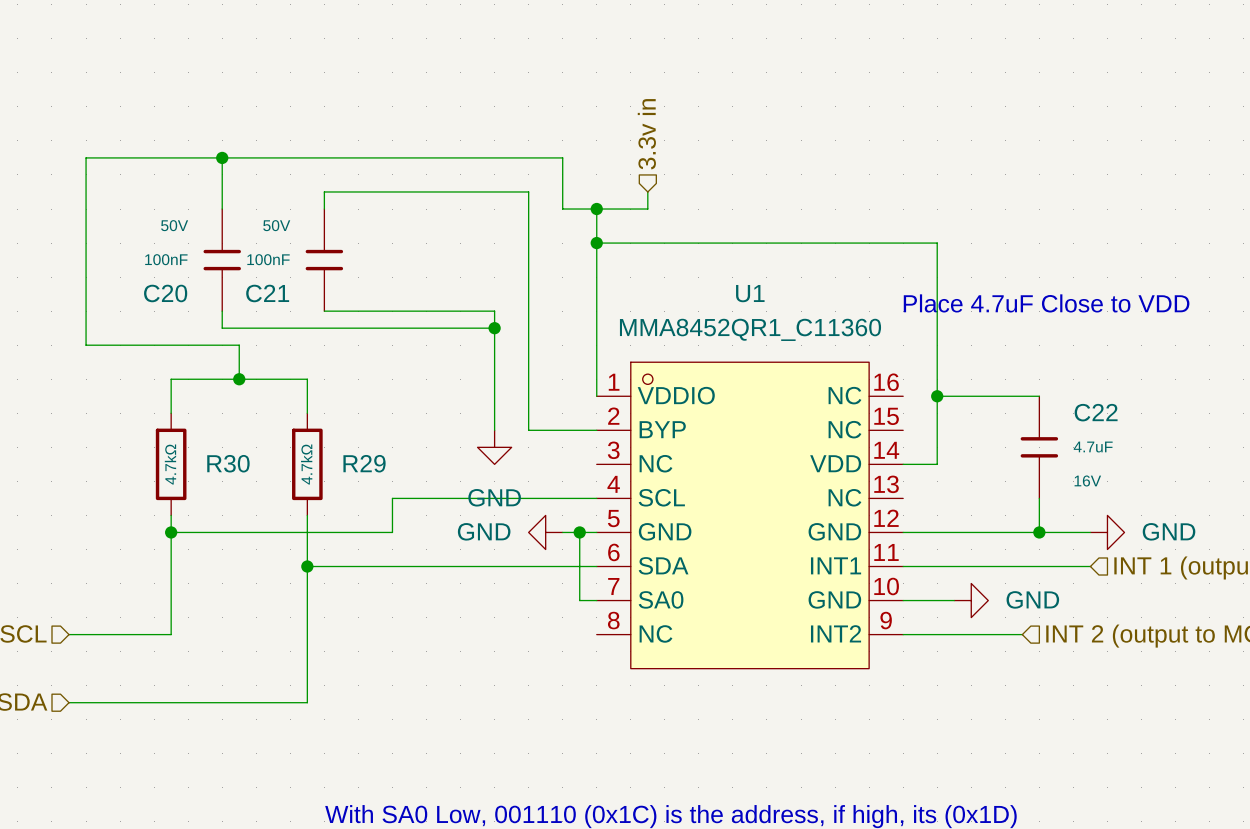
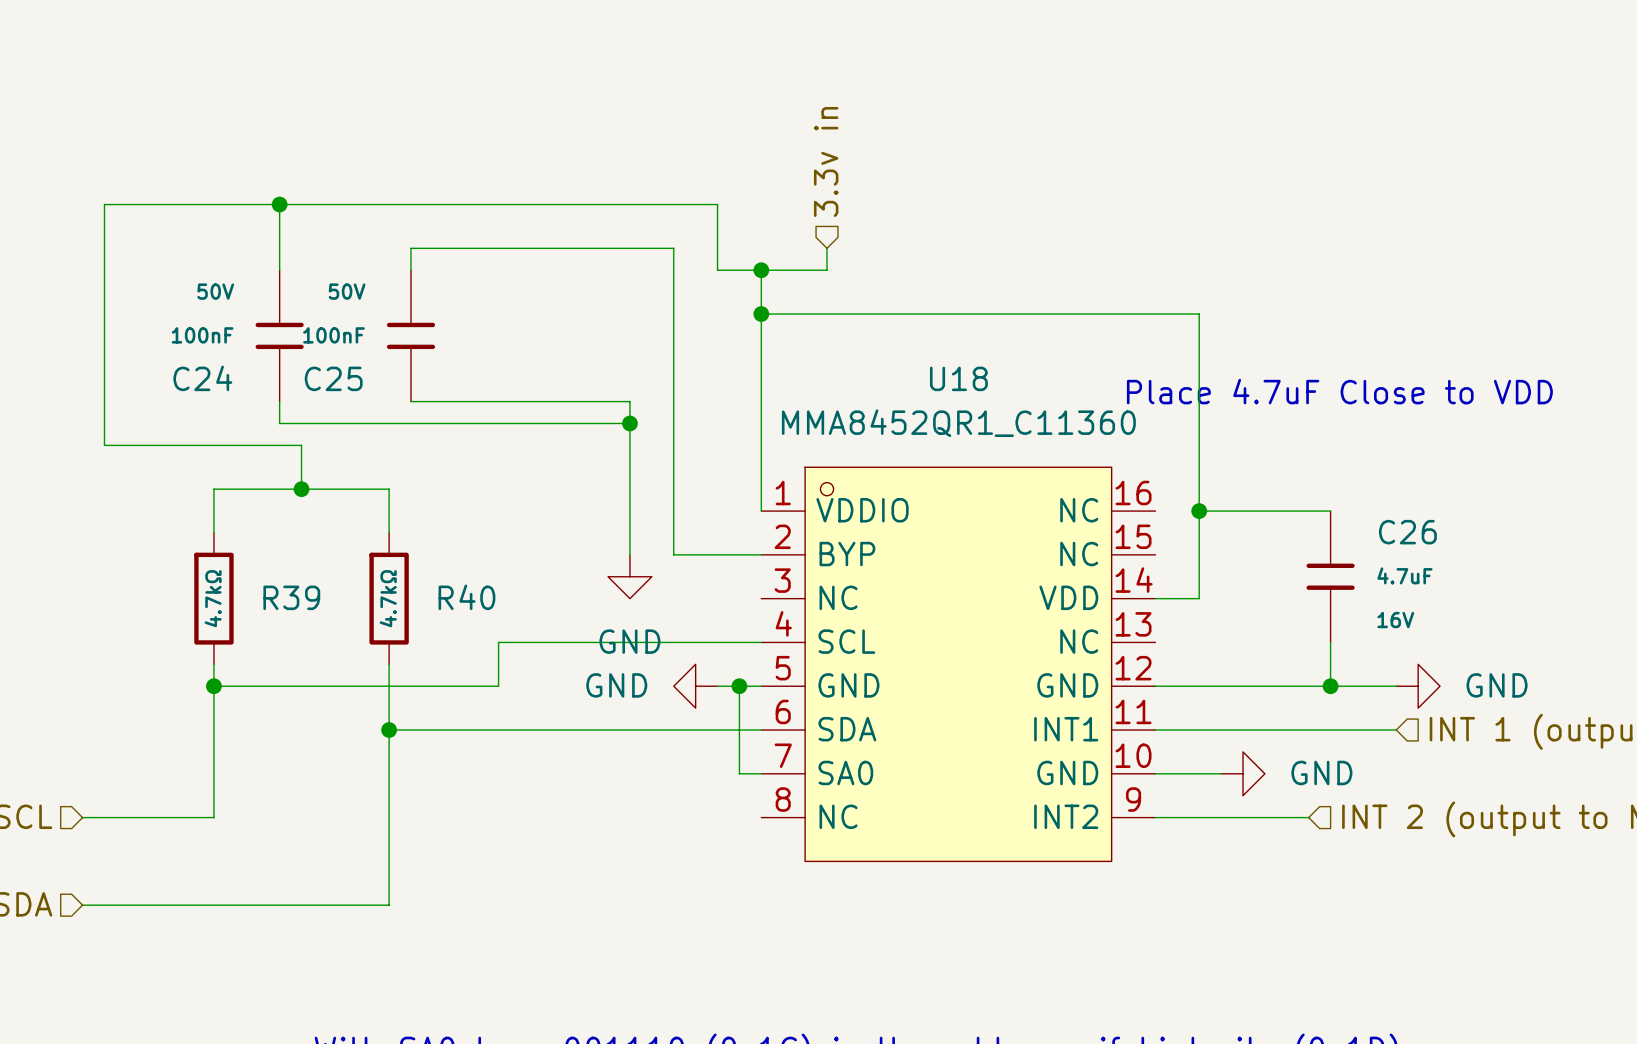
C20 name: C20 (165, 293) -> C24 (202, 378)
C21 name: C21 (267, 293) -> C25 (333, 378)
U1 name: U1 (750, 293) -> U18 (958, 378)
C22 name: C22 (1096, 412) -> C26 (1407, 532)
R30 name: R30 (228, 463) -> R39 (291, 597)
R29 name: R29 (364, 463) -> R40 (466, 597)

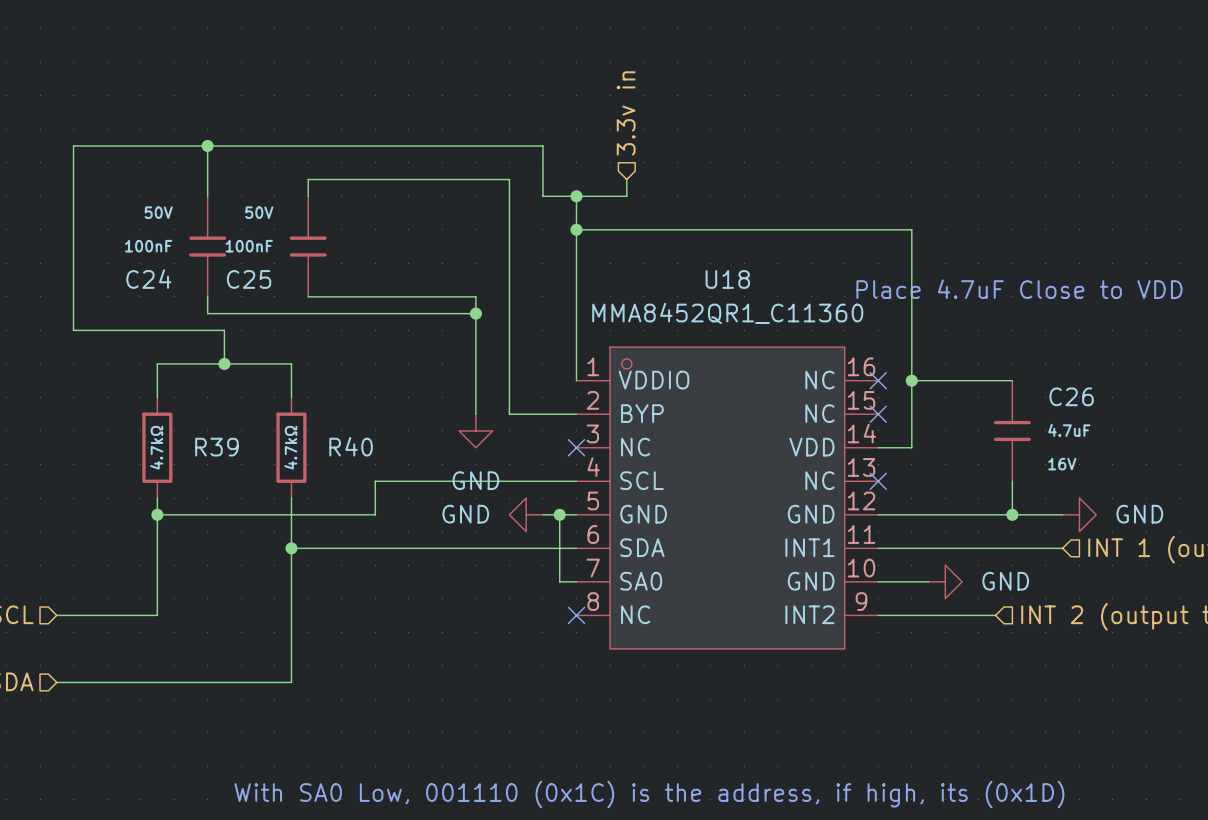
no-connect mark: none -> (878, 380)
no-connect mark: none -> (878, 414)
no-connect mark: none -> (576, 447)
no-connect mark: none -> (878, 481)
no-connect mark: none -> (576, 615)

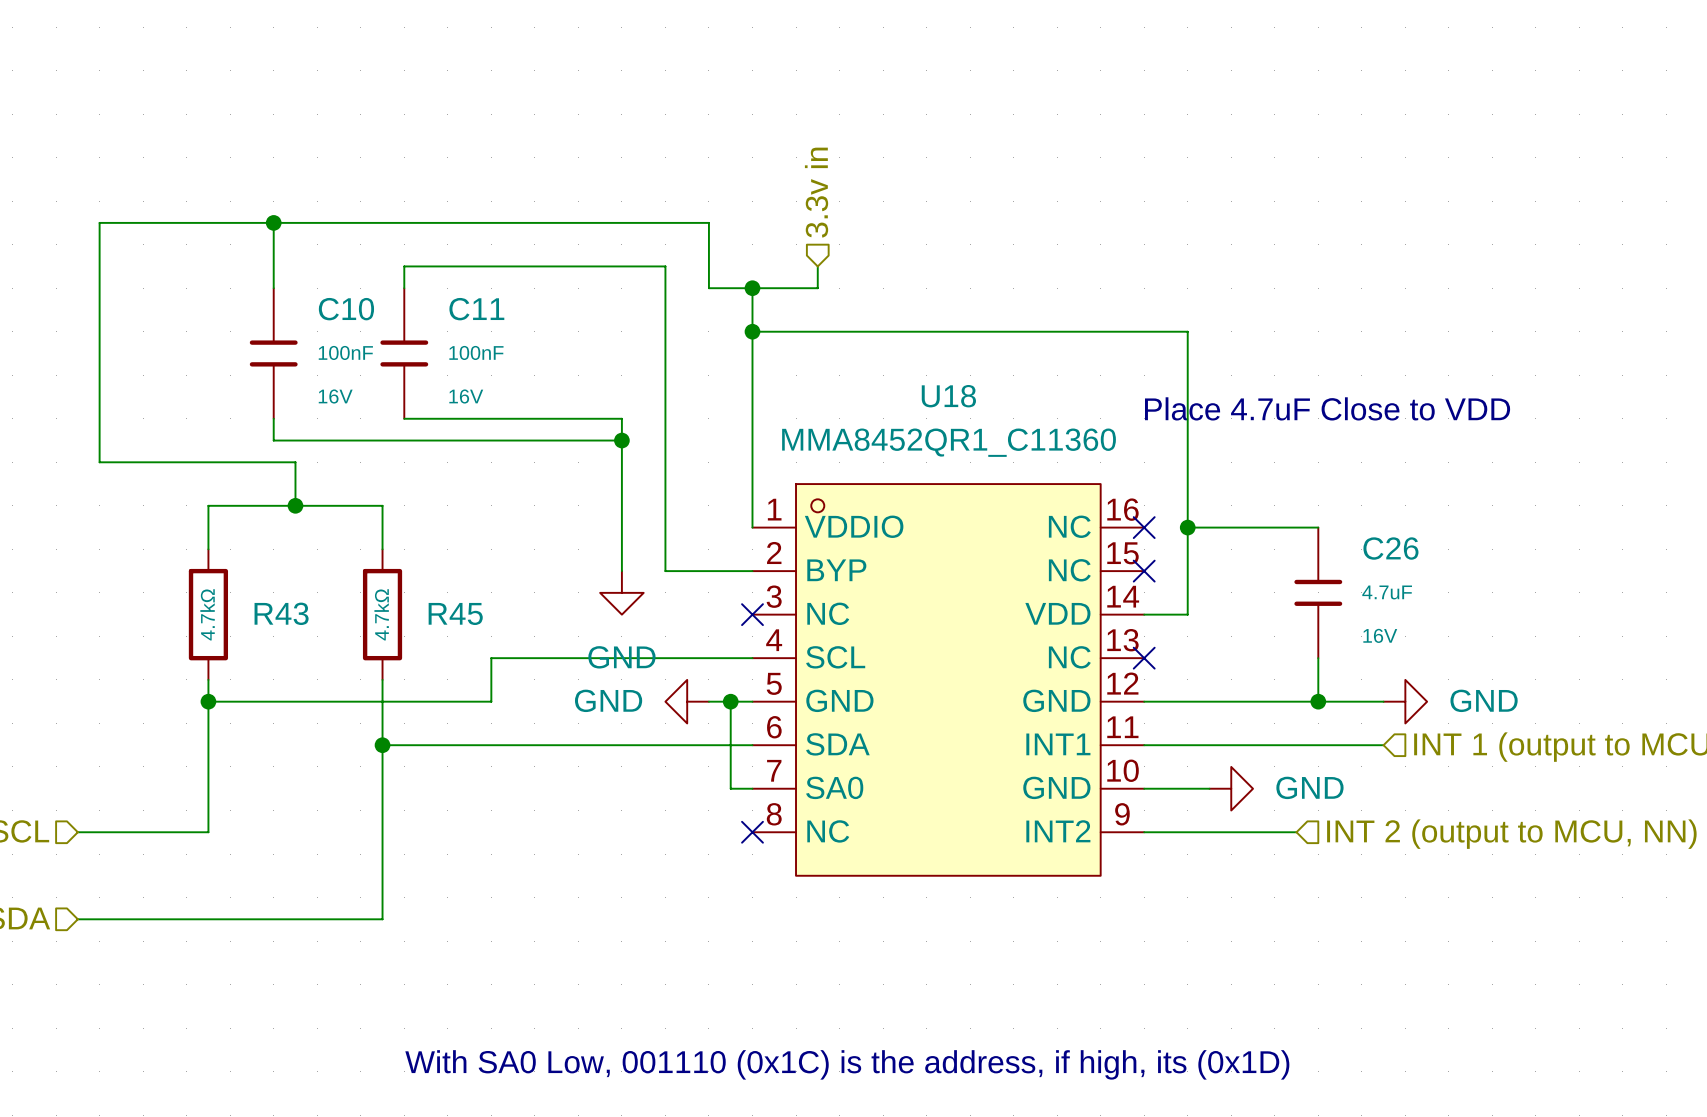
C24 text: 50V (158, 212) -> 16V (335, 396)
C25 text: 50V (259, 212) -> 16V (466, 396)
C24 value position: 100nF (148, 246) -> 100nF (345, 352)
C25 value position: 100nF (249, 246) -> 100nF (476, 352)
C24 name: C24 (148, 279) -> C10 (346, 309)
C25 name: C25 (249, 279) -> C11 (476, 309)
R40 name: R40 (351, 446) -> R45 (455, 613)
R39 name: R39 (216, 447) -> R43 (281, 613)

